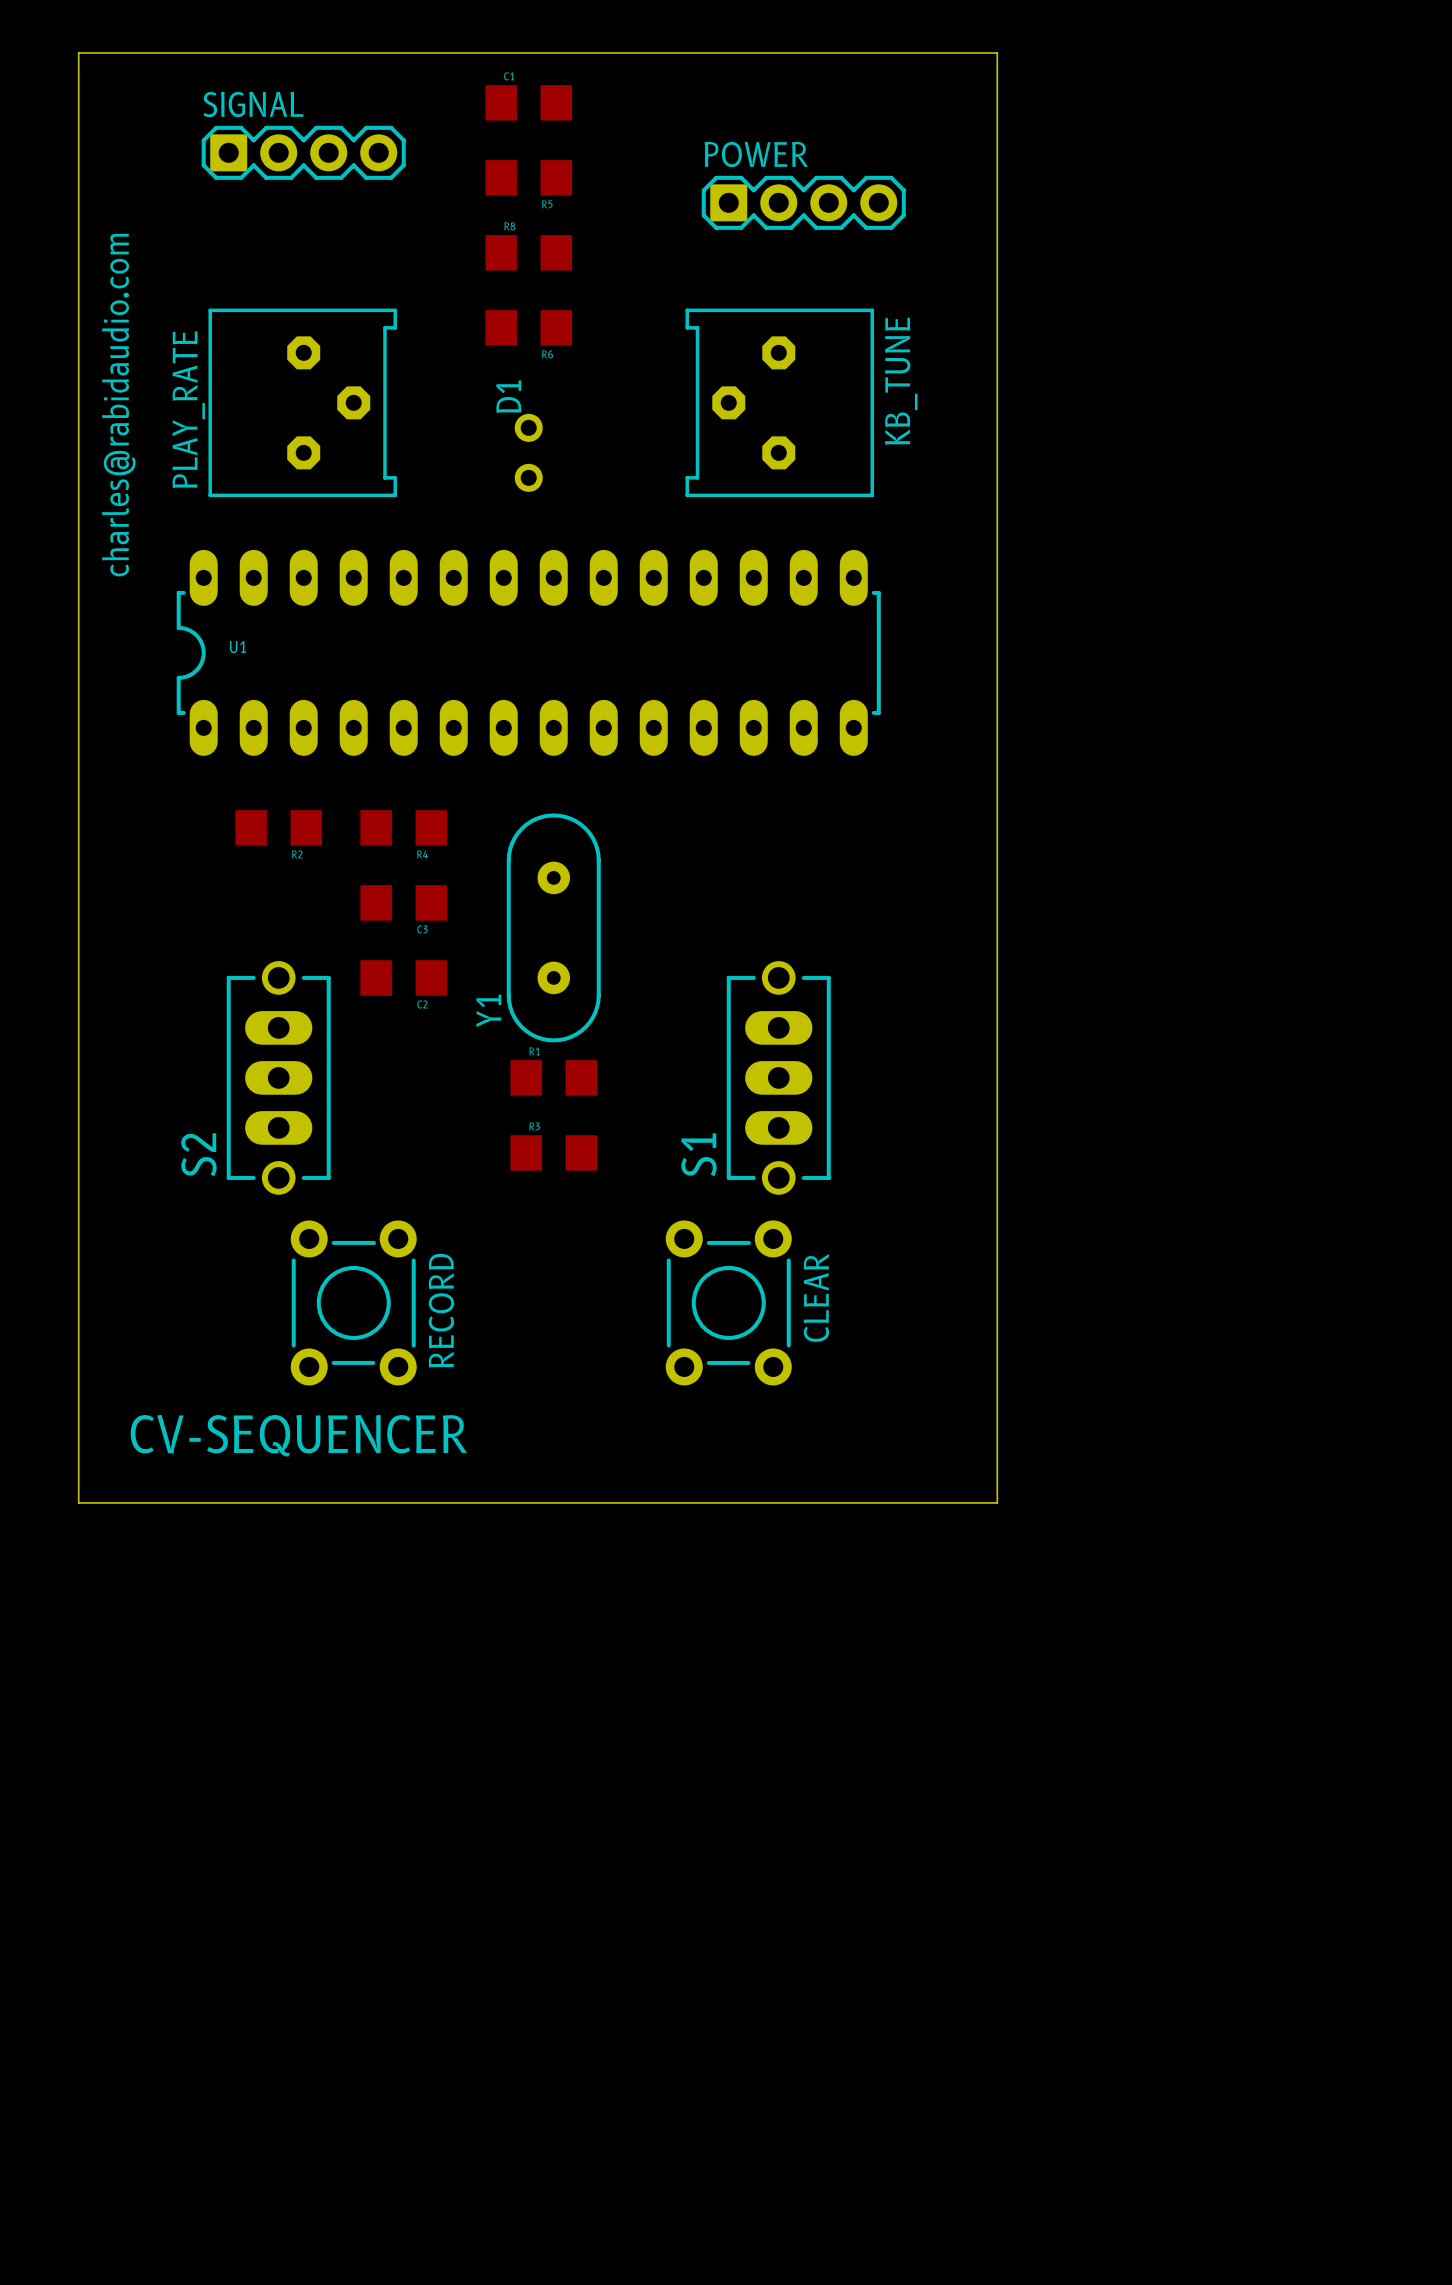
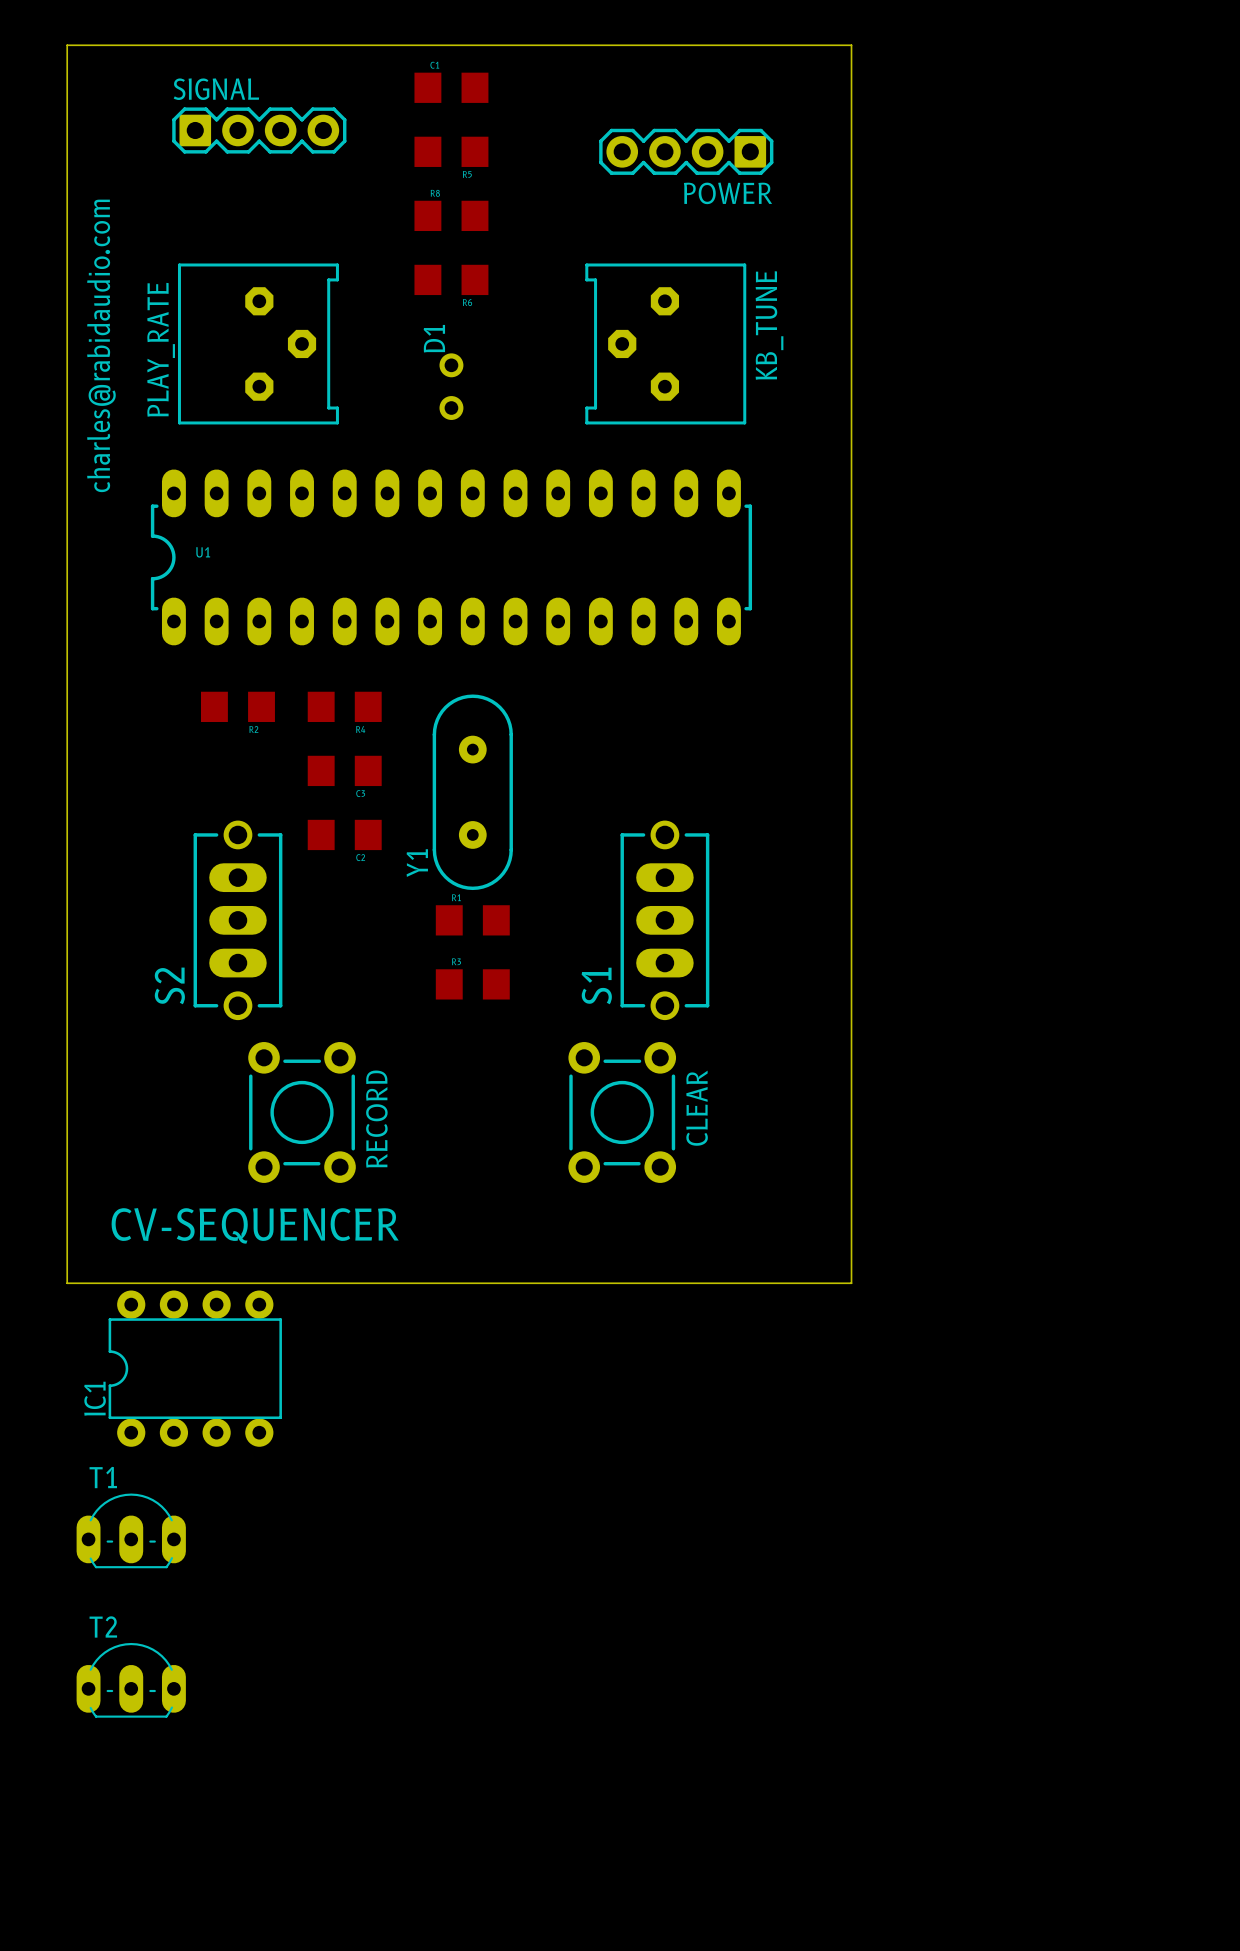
POWER rotation: 0° (803, 202) -> 180° (686, 151)
IC1: none -> (195, 1368)
T1: none -> (131, 1530)
T2: none -> (131, 1680)

